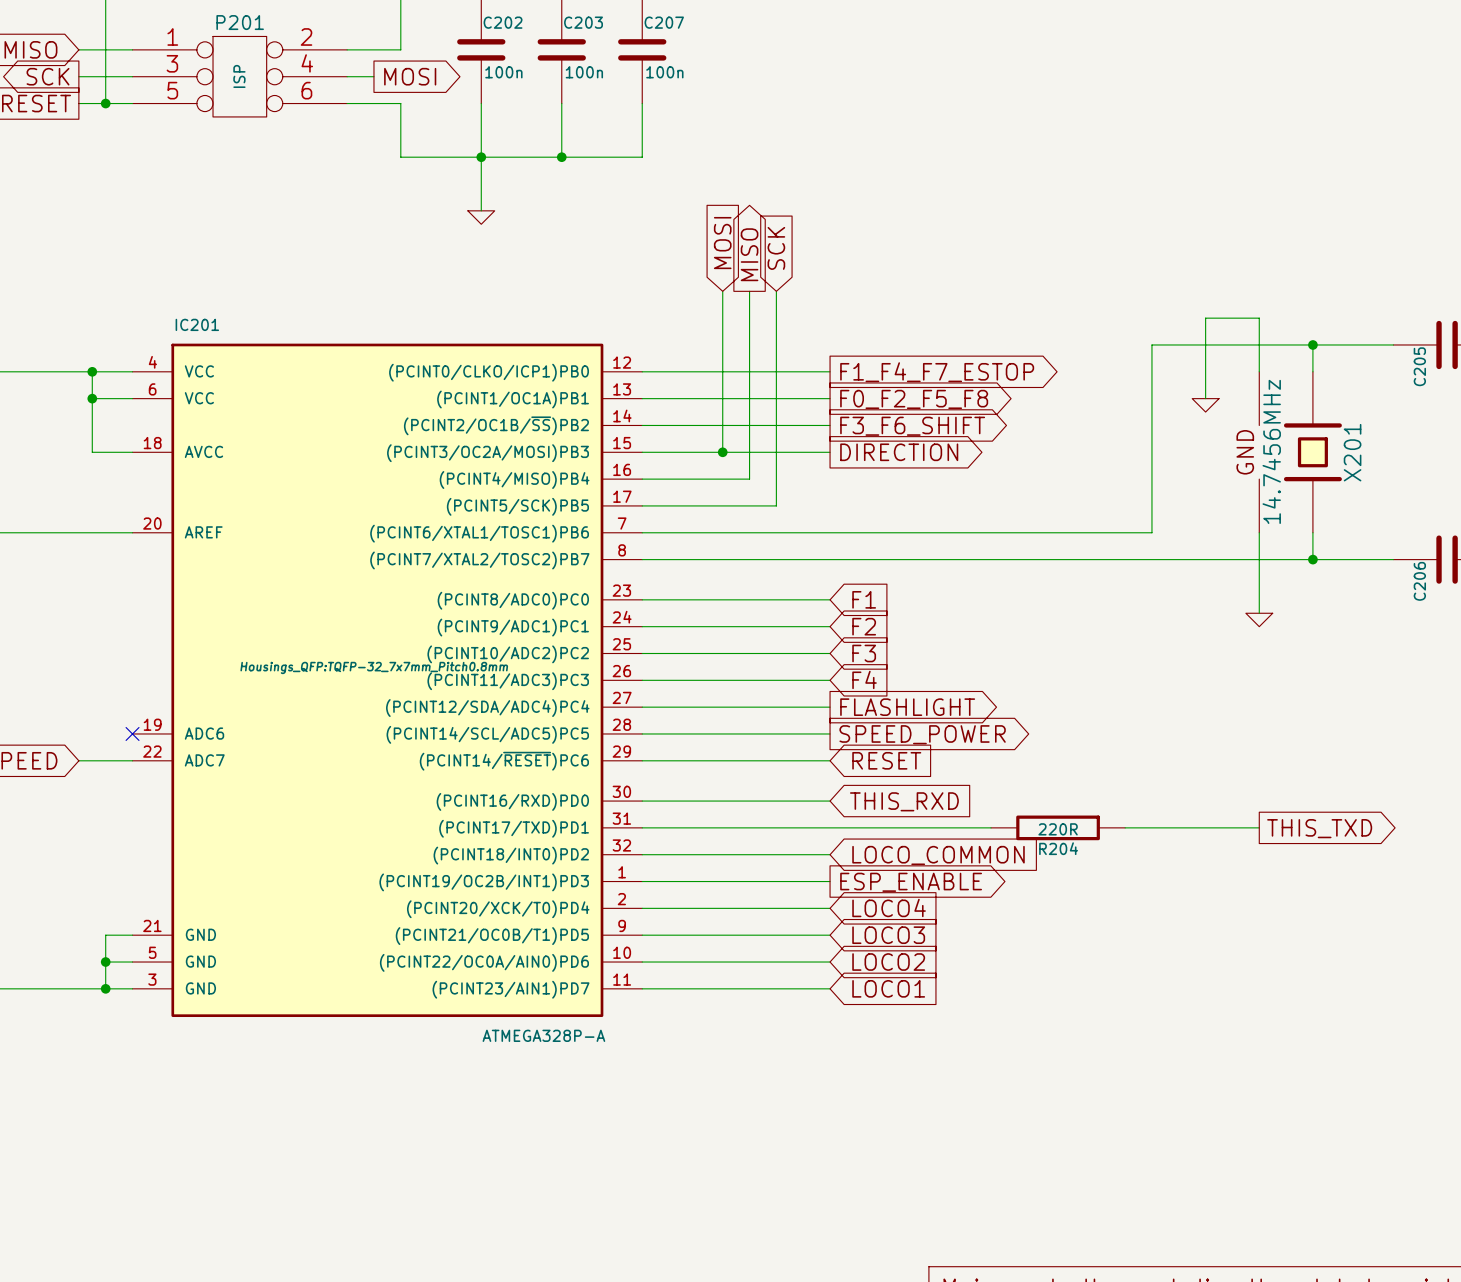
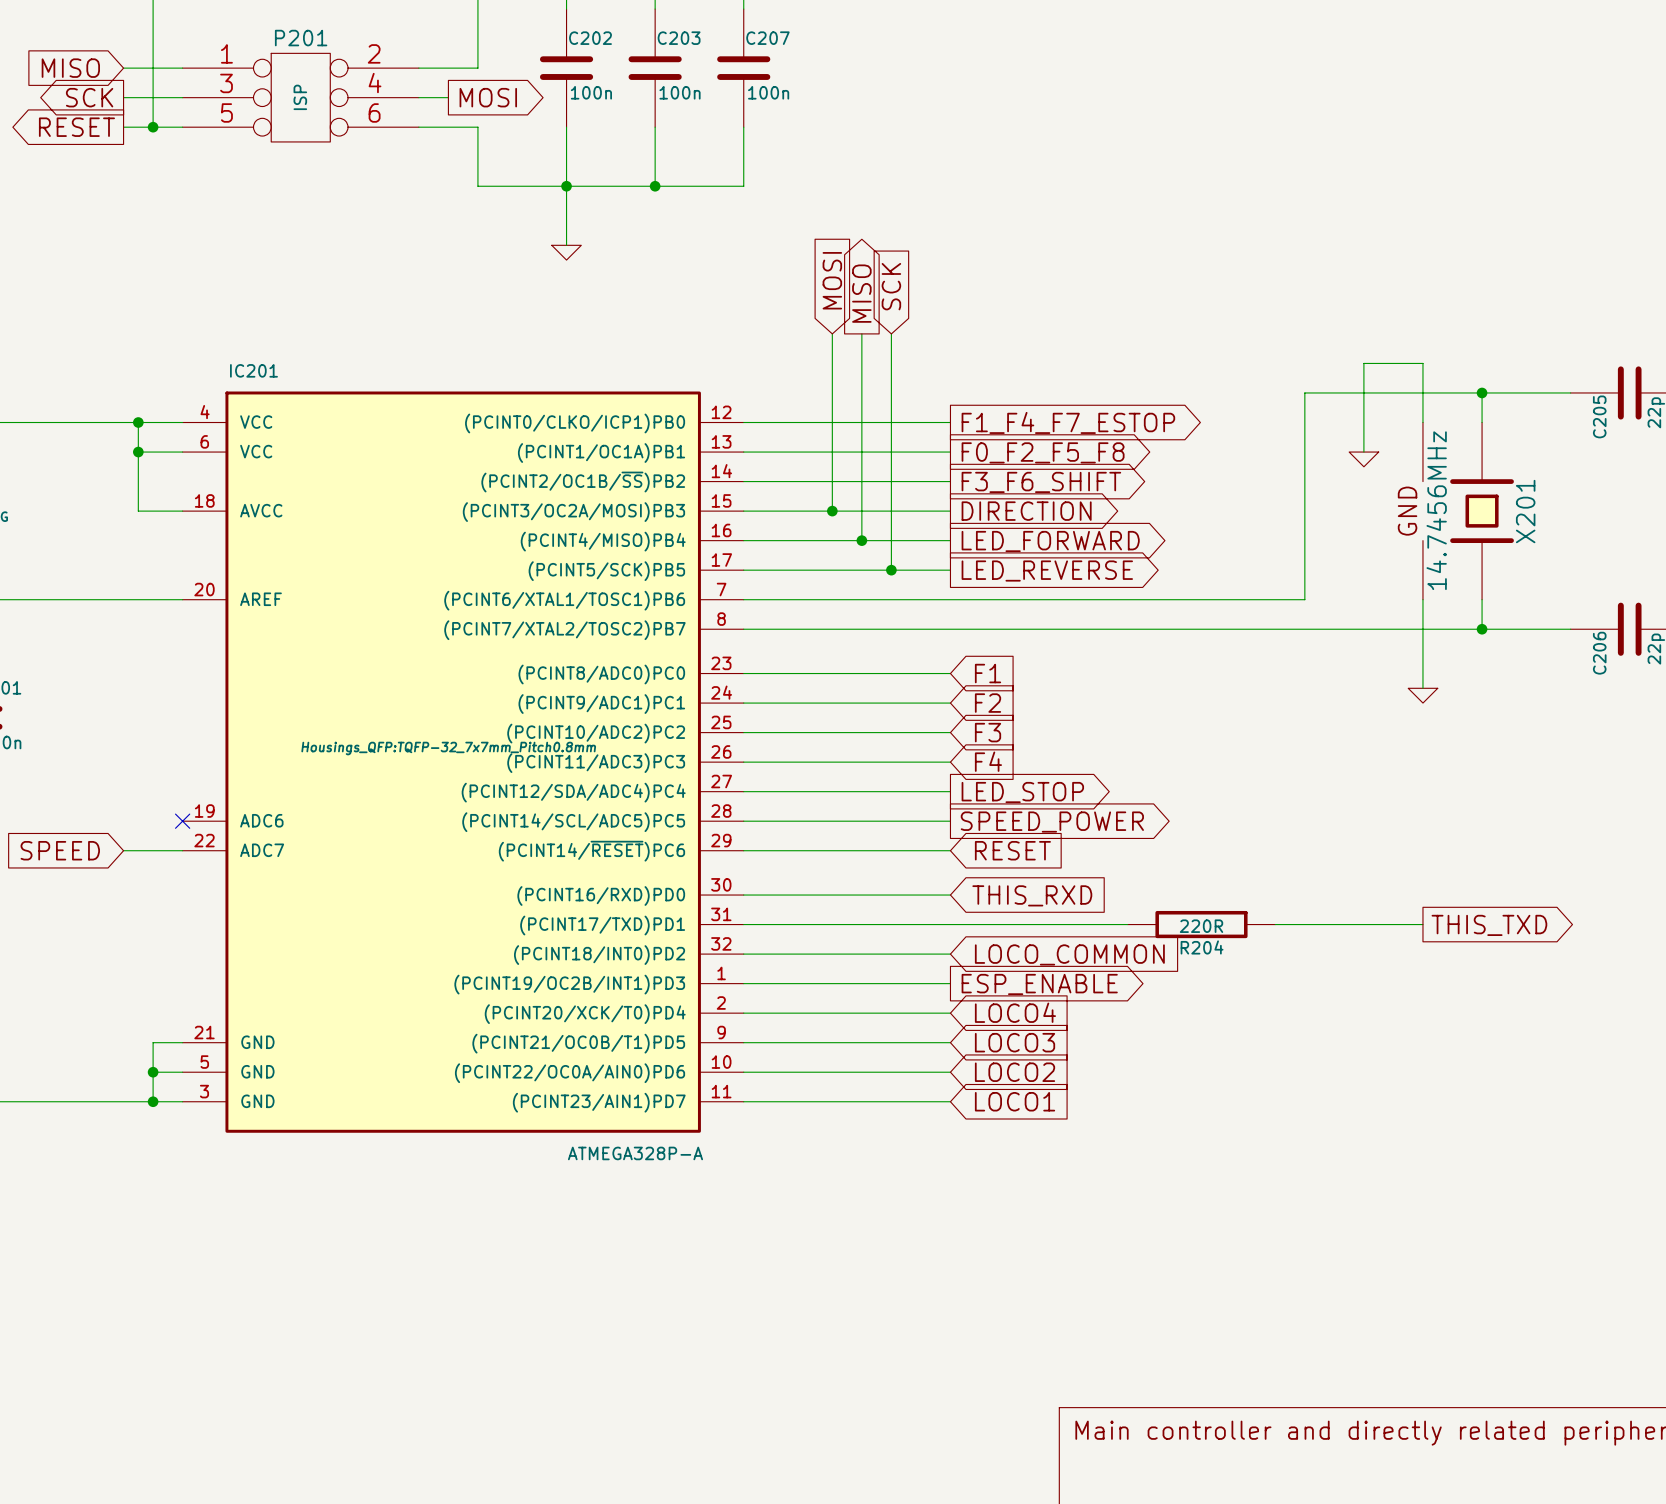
wire: none -> (861, 540) (950, 540)
junction: none -> (861, 540)
global label: none -> LED_FORWARD (1050, 541)
wire: none -> (891, 570) (950, 570)
junction: none -> (891, 570)
global label: none -> LED_REVERSE (1047, 571)
global label: FLASHLIGHT (907, 707) -> LED_STOP (1022, 792)

